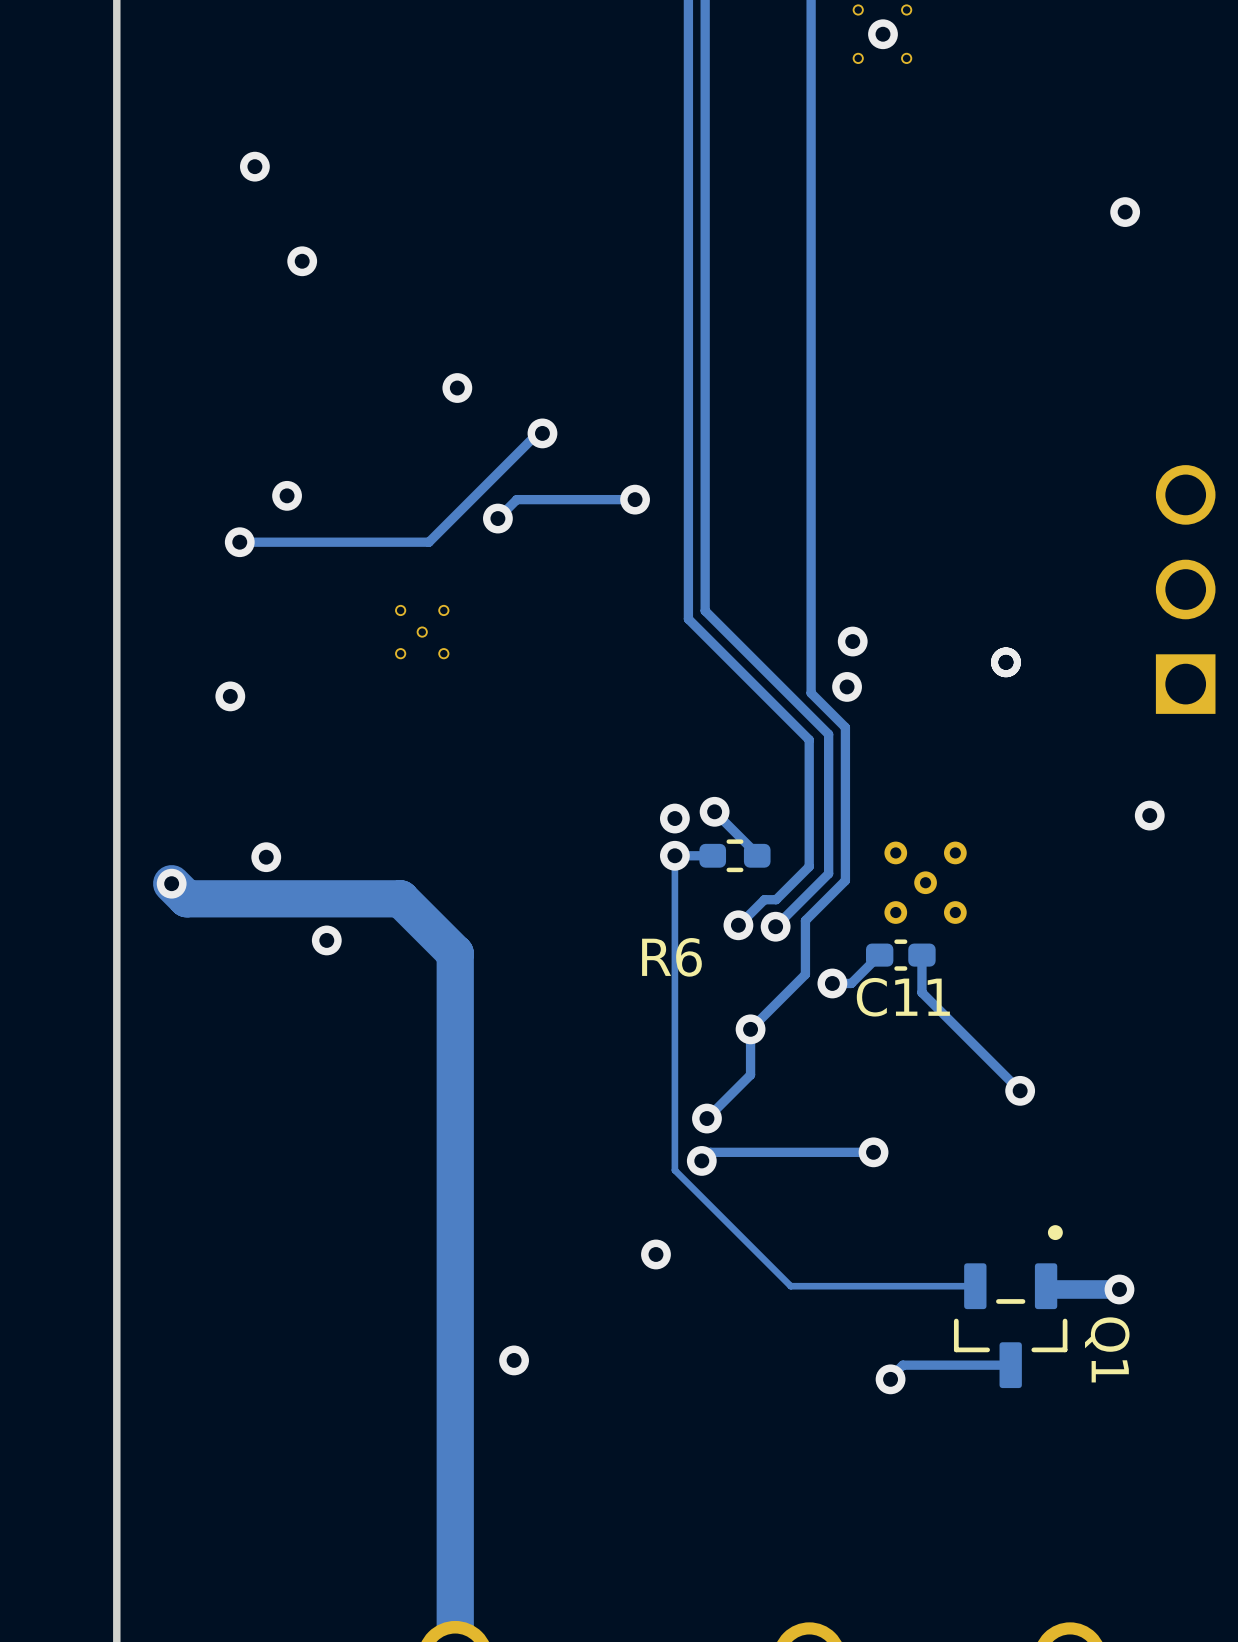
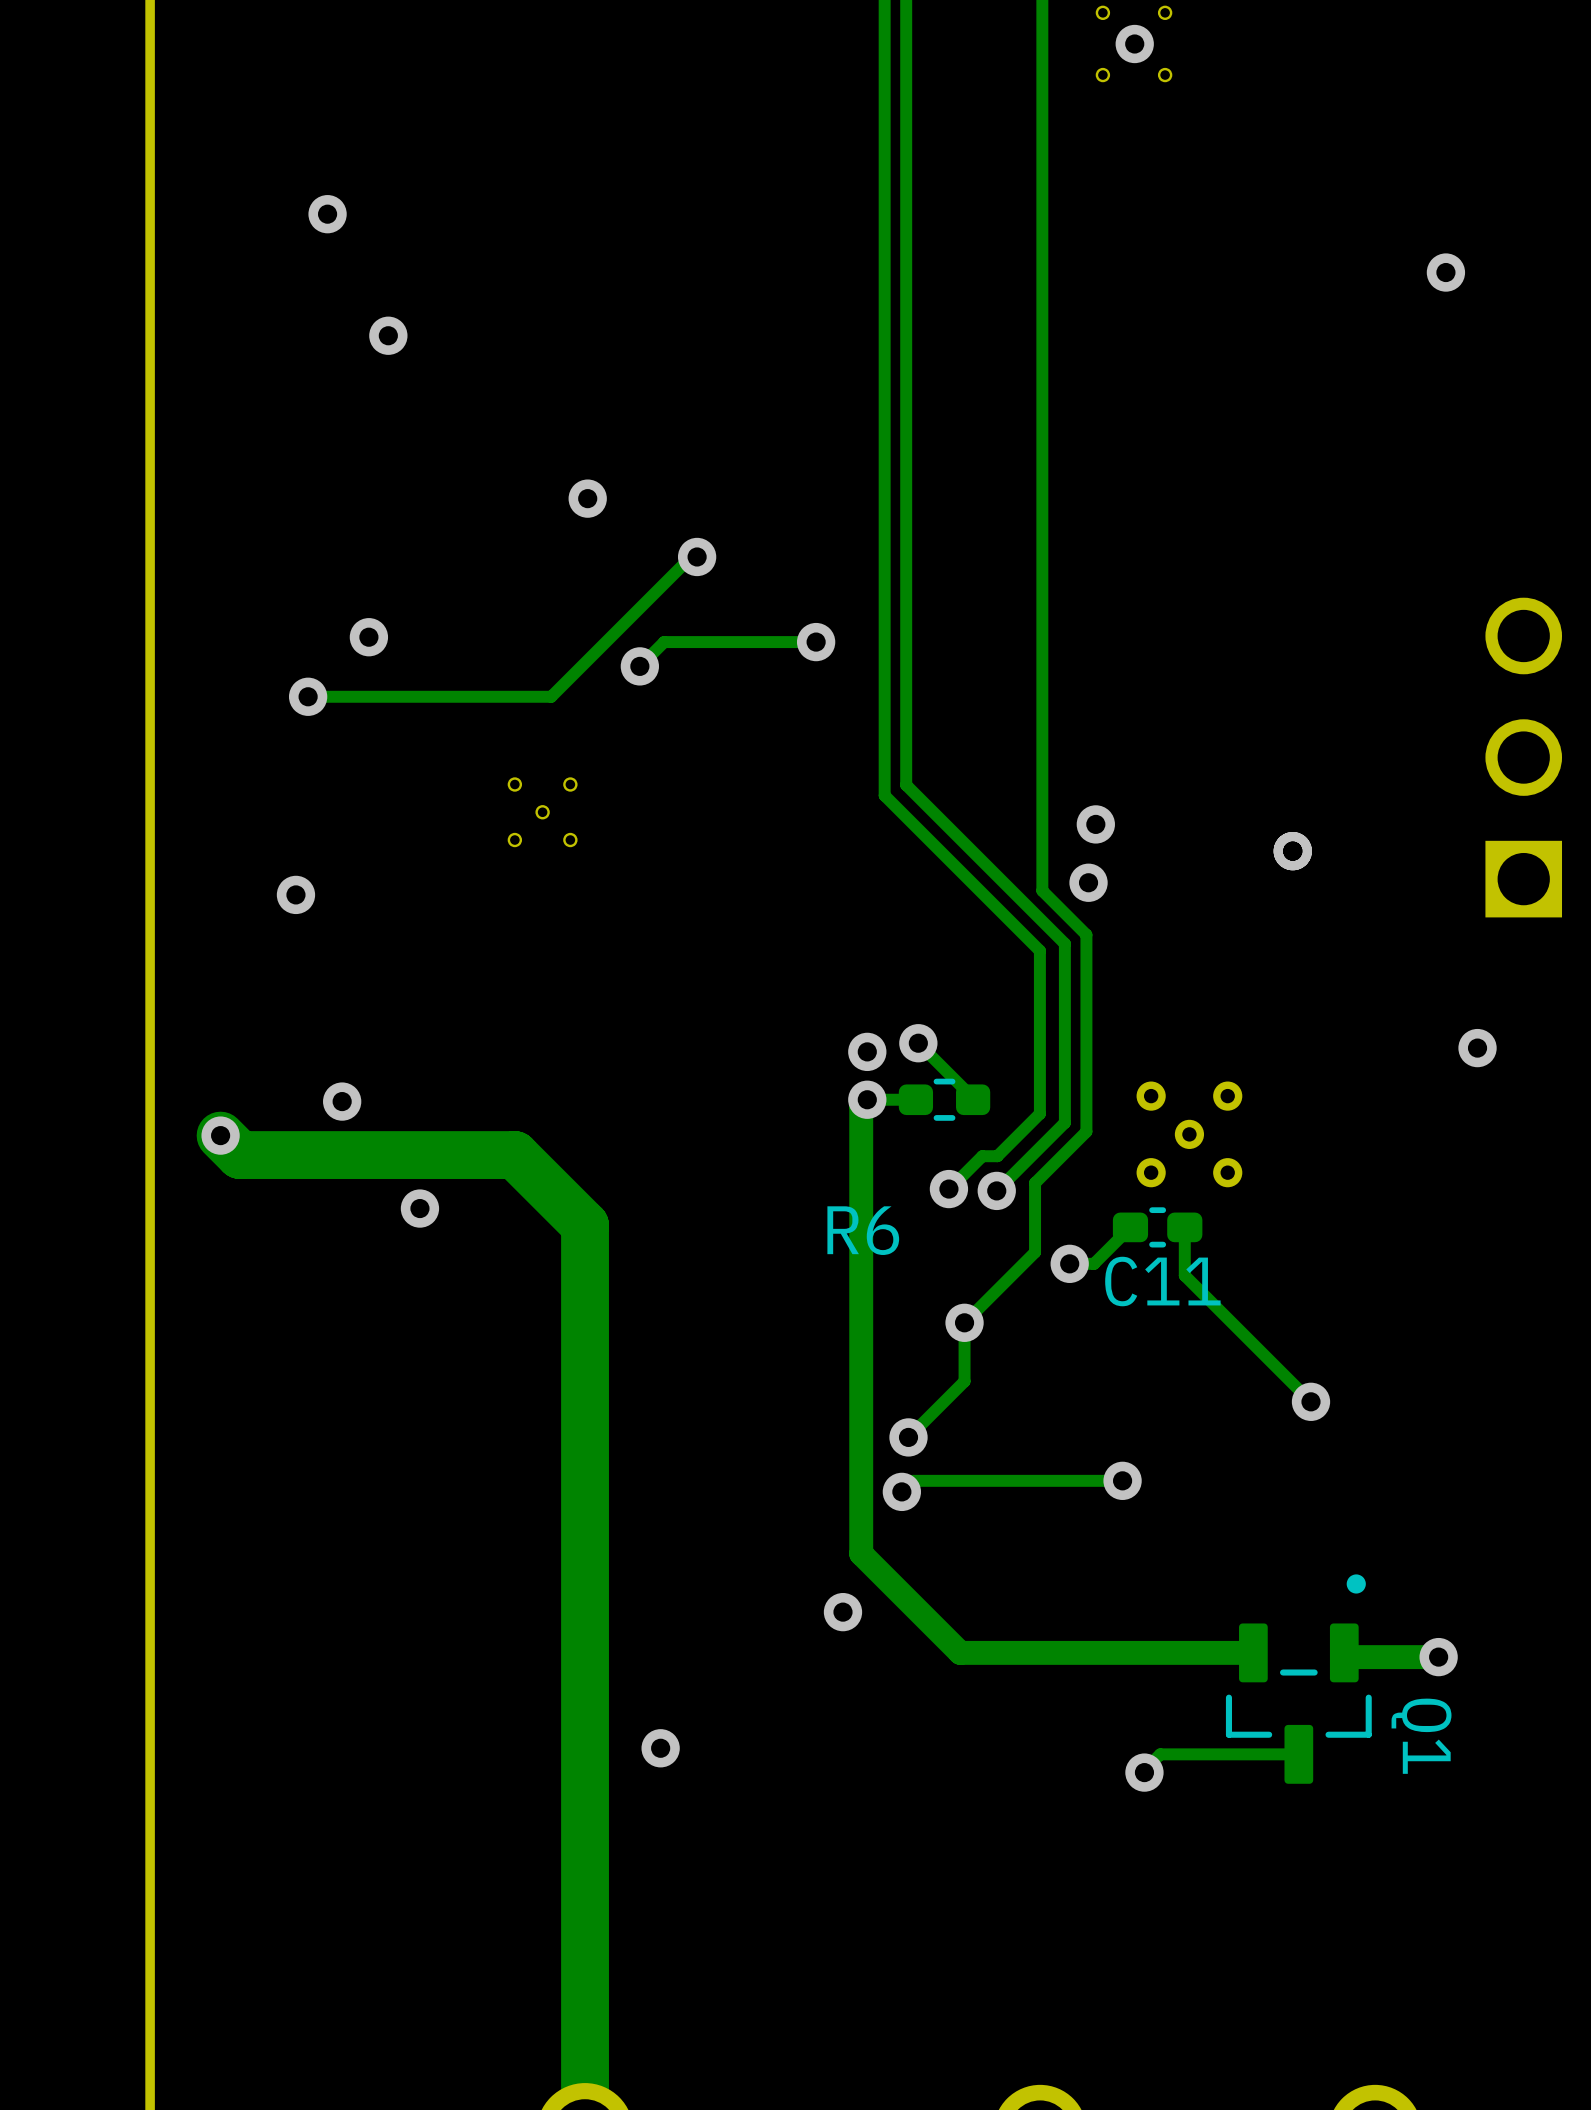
track: (674, 855) (674, 1170) (790, 1286) -> (867, 1099) (861, 1105) (861, 1553) (960, 1652) (1016, 1652)
track width: thin (975, 1286) (790, 1286) -> thick (1253, 1652) (1016, 1652)

